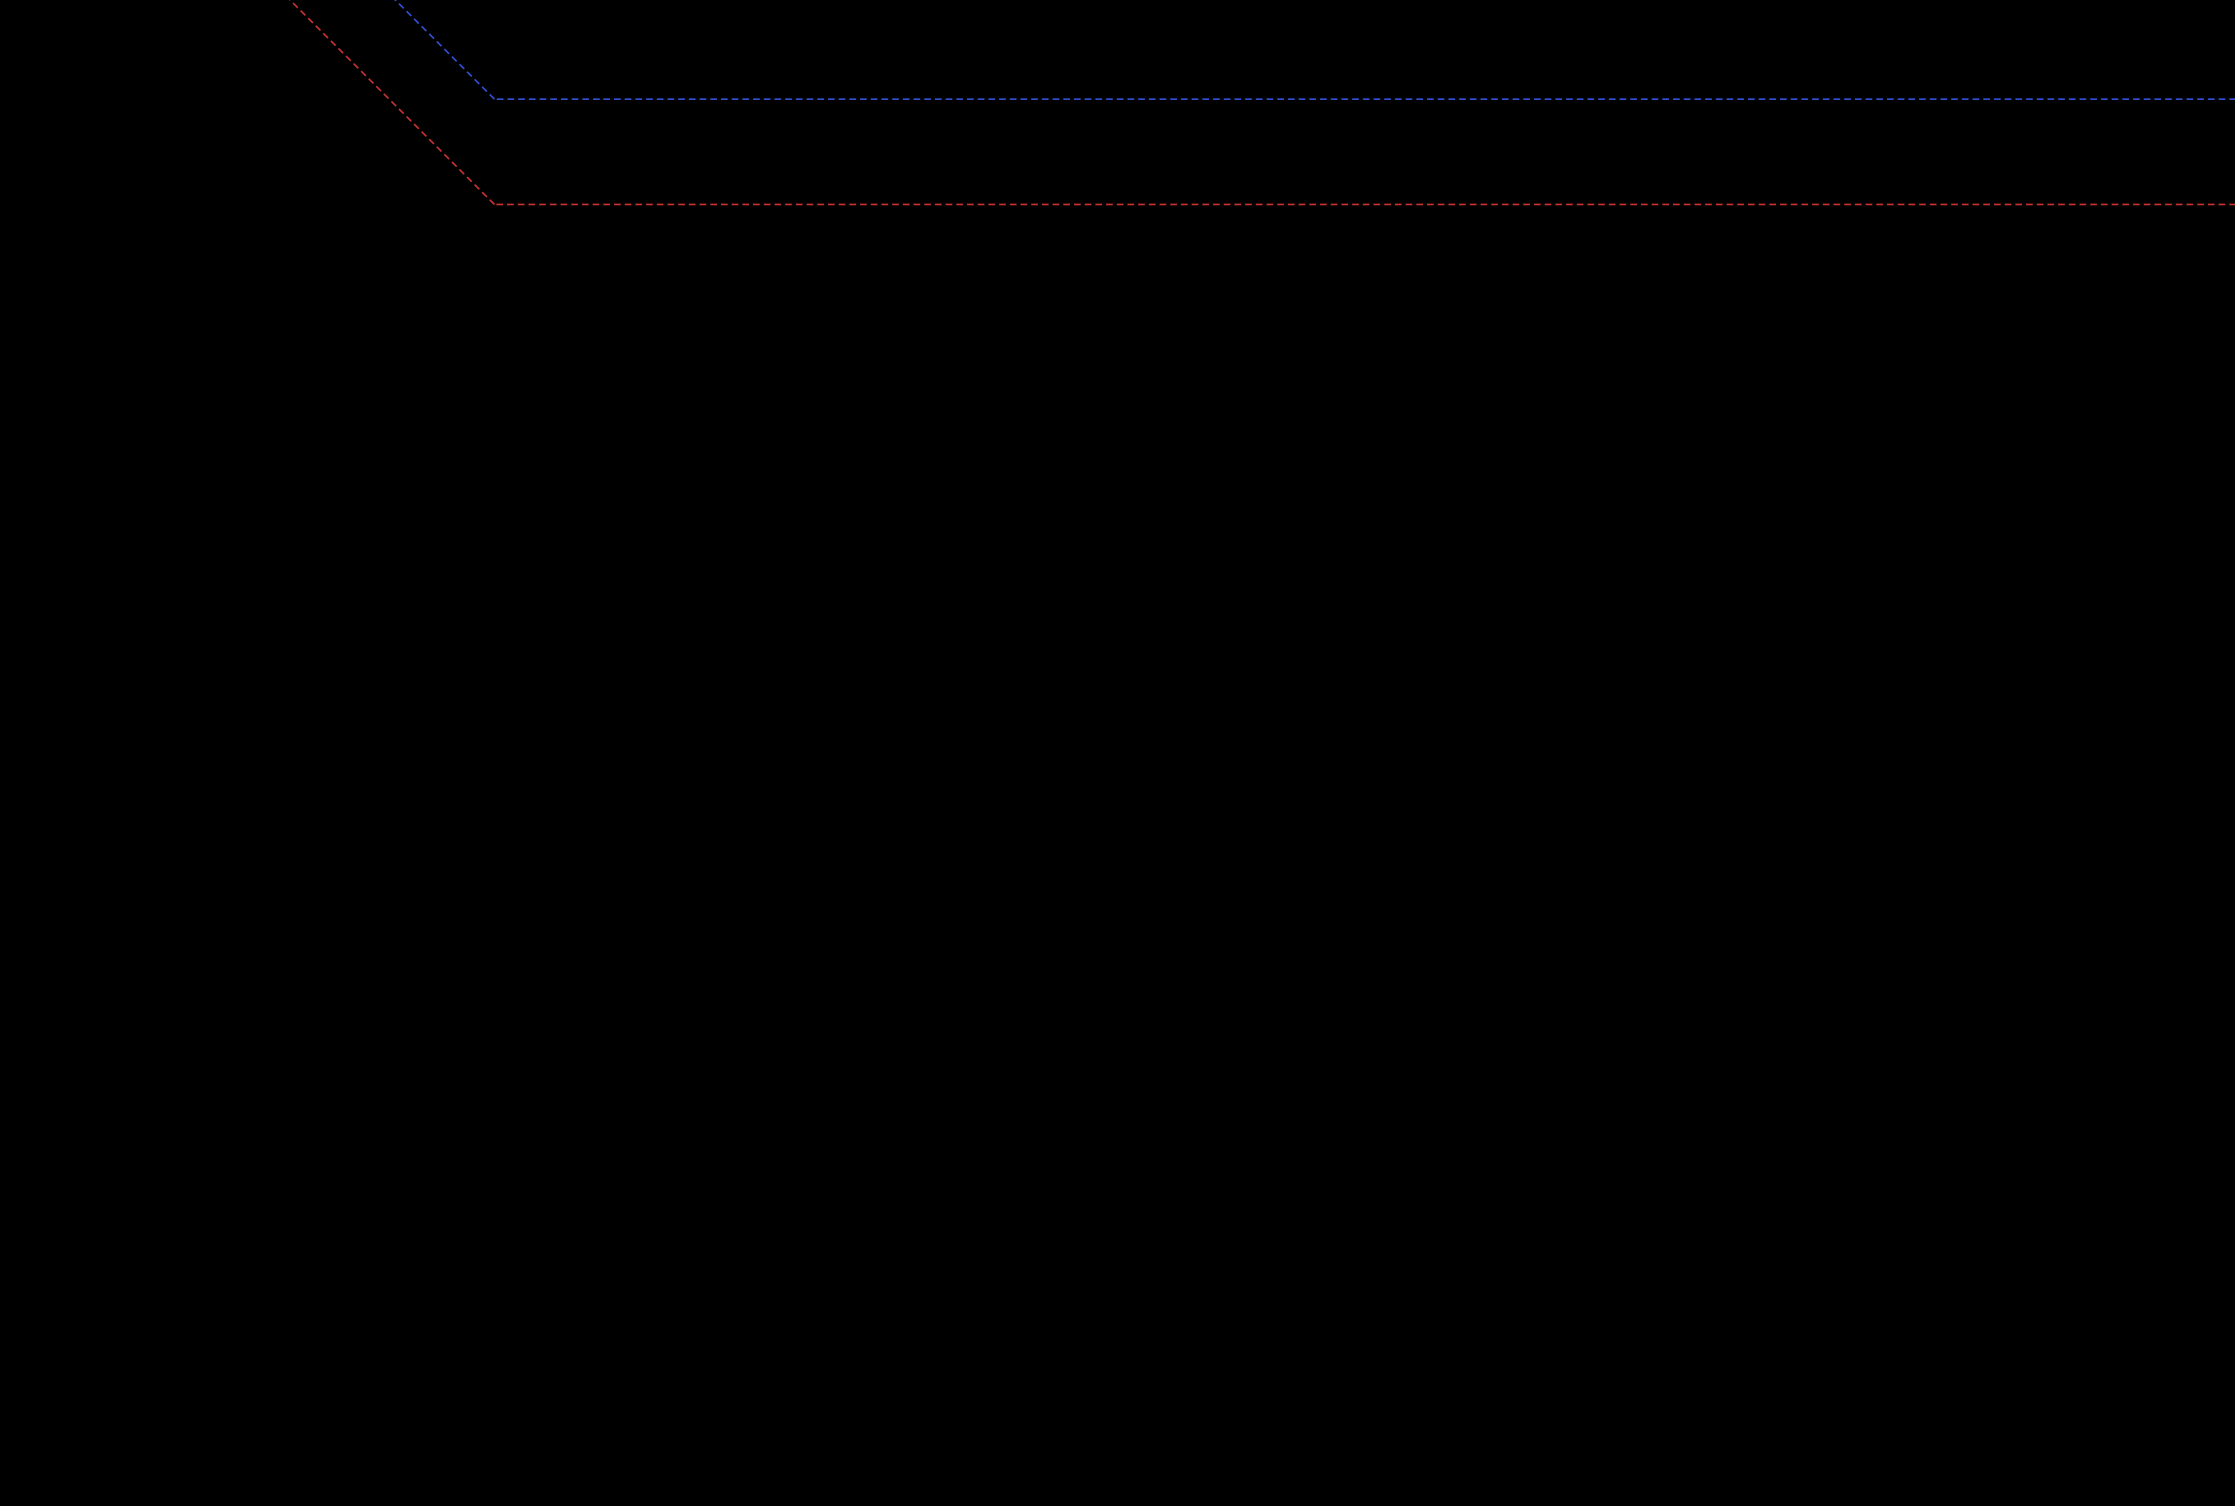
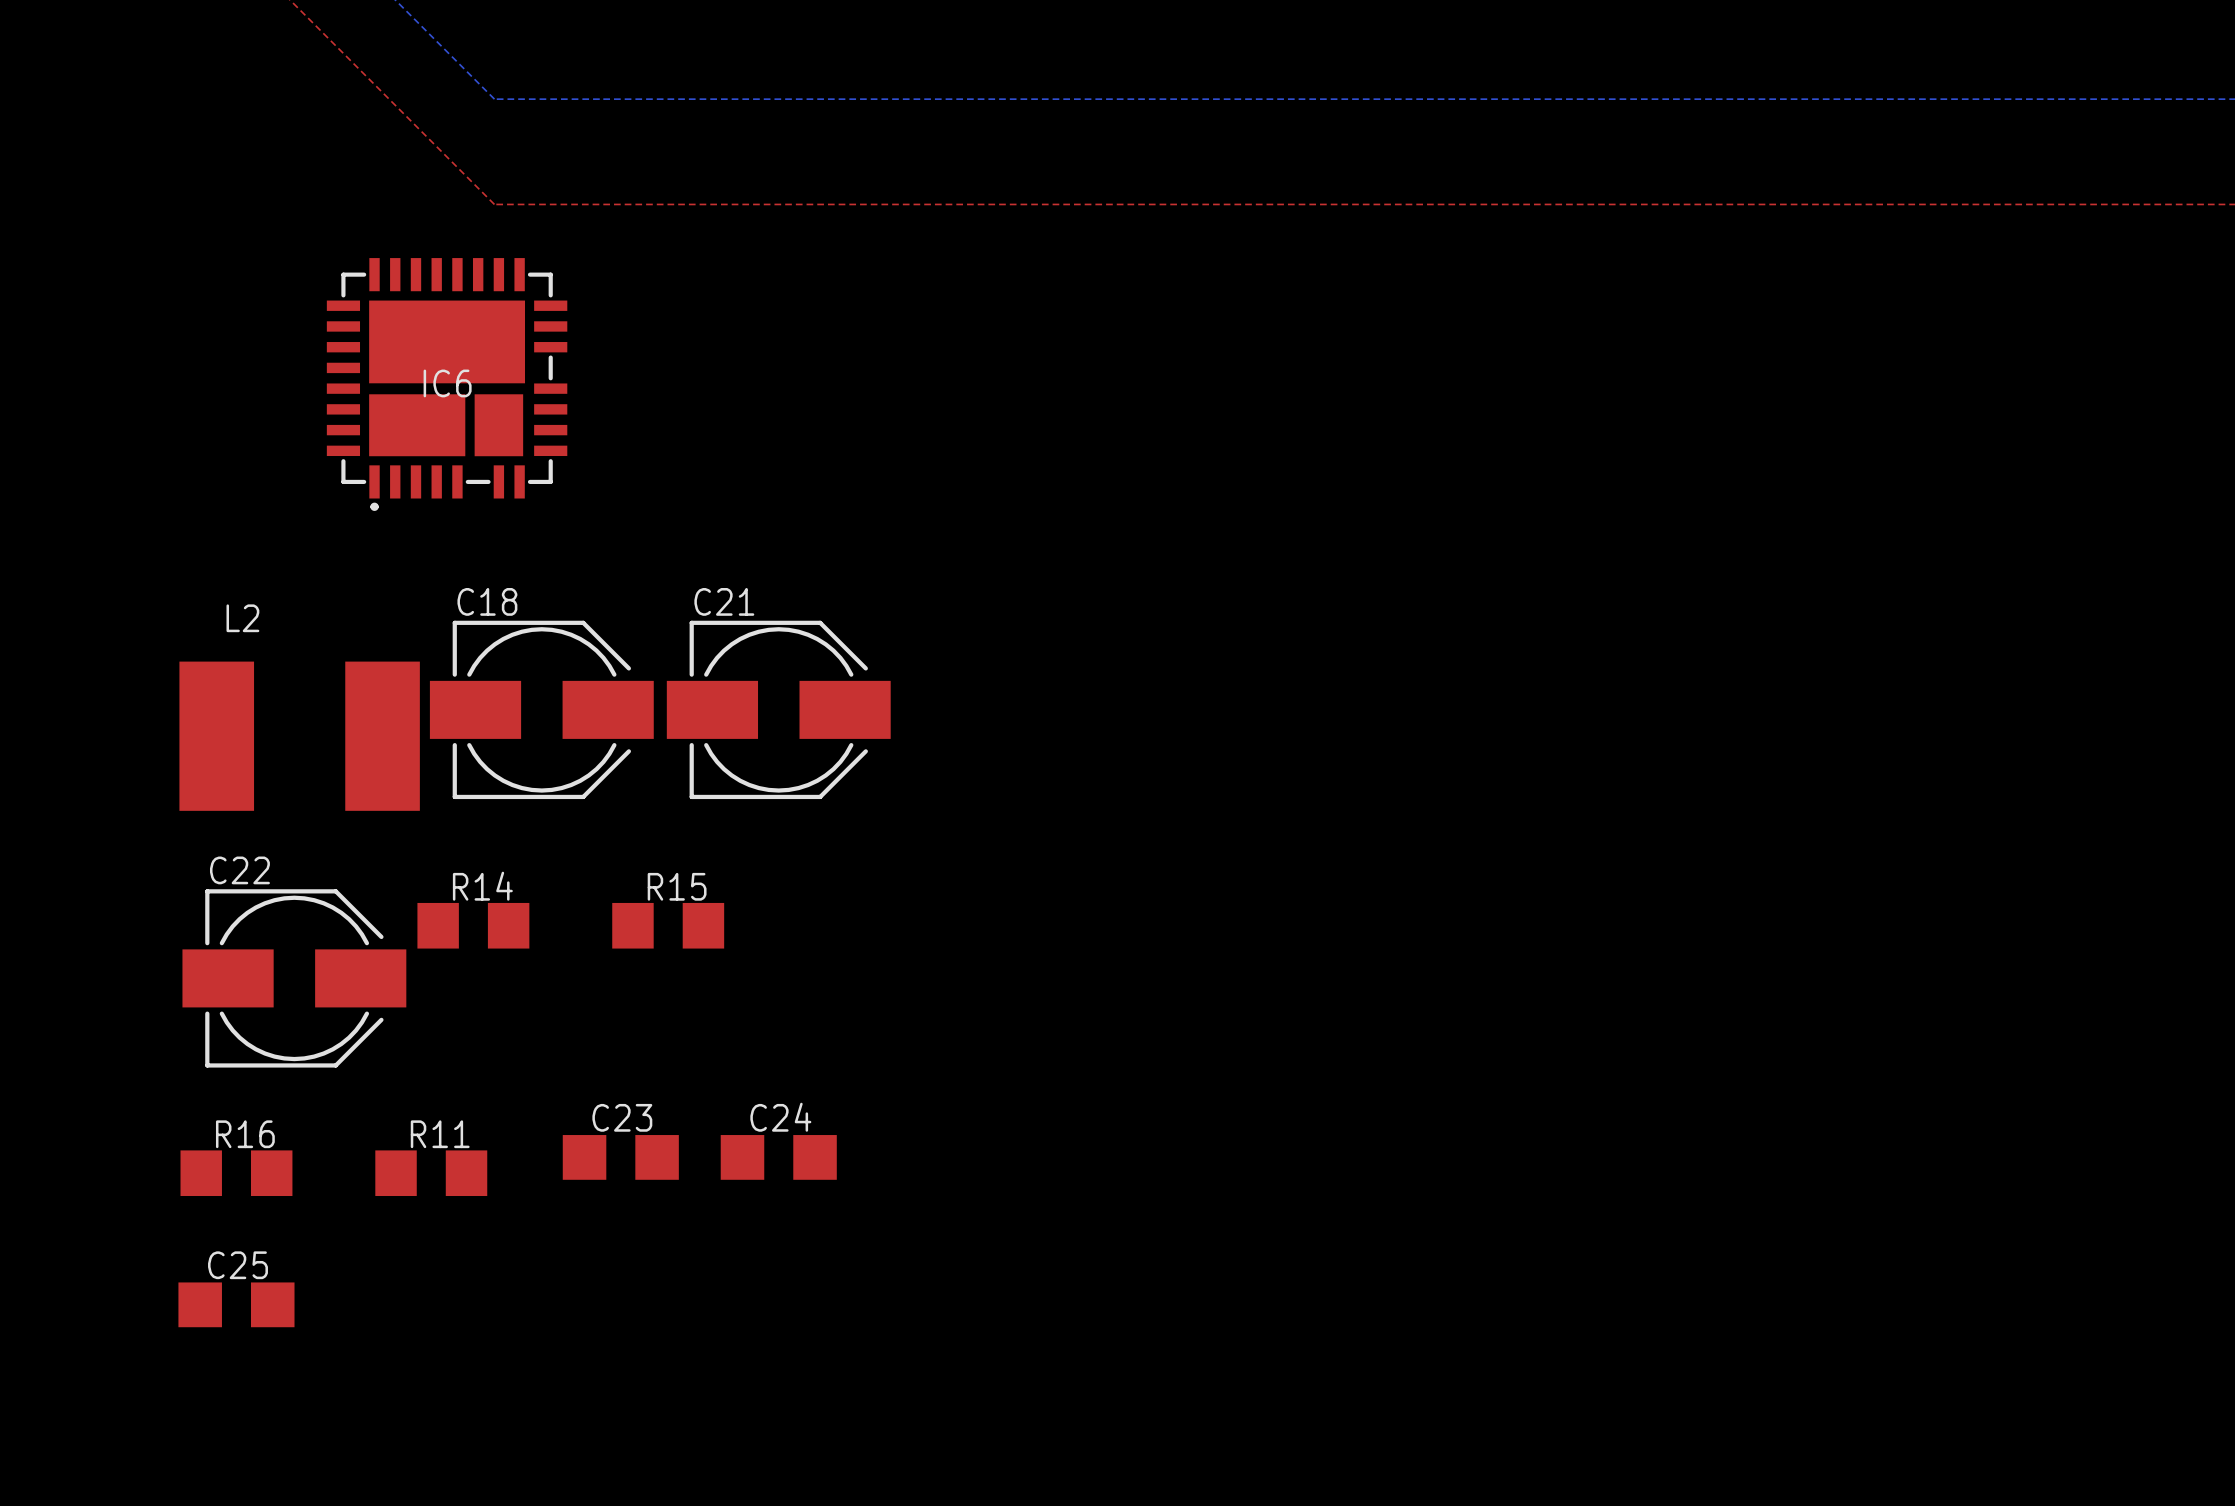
IC6: none -> (447, 384)
C18: none -> (541, 709)
C21: none -> (778, 709)
L2: none -> (299, 736)
R14: none -> (473, 925)
R15: none -> (668, 925)
C22: none -> (294, 978)
C23: none -> (620, 1157)
C24: none -> (778, 1157)
R16: none -> (236, 1173)
R11: none -> (431, 1173)
C25: none -> (236, 1304)

